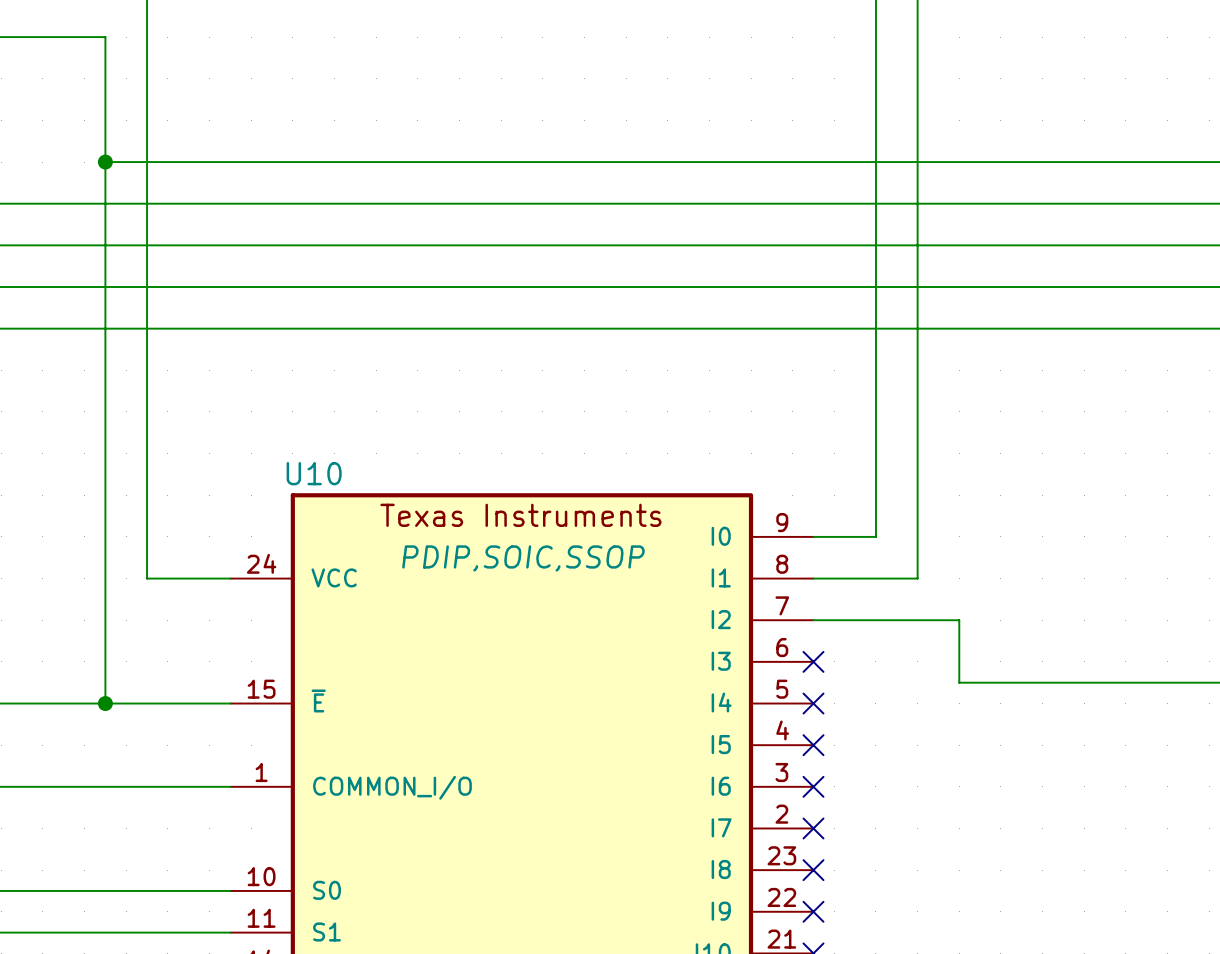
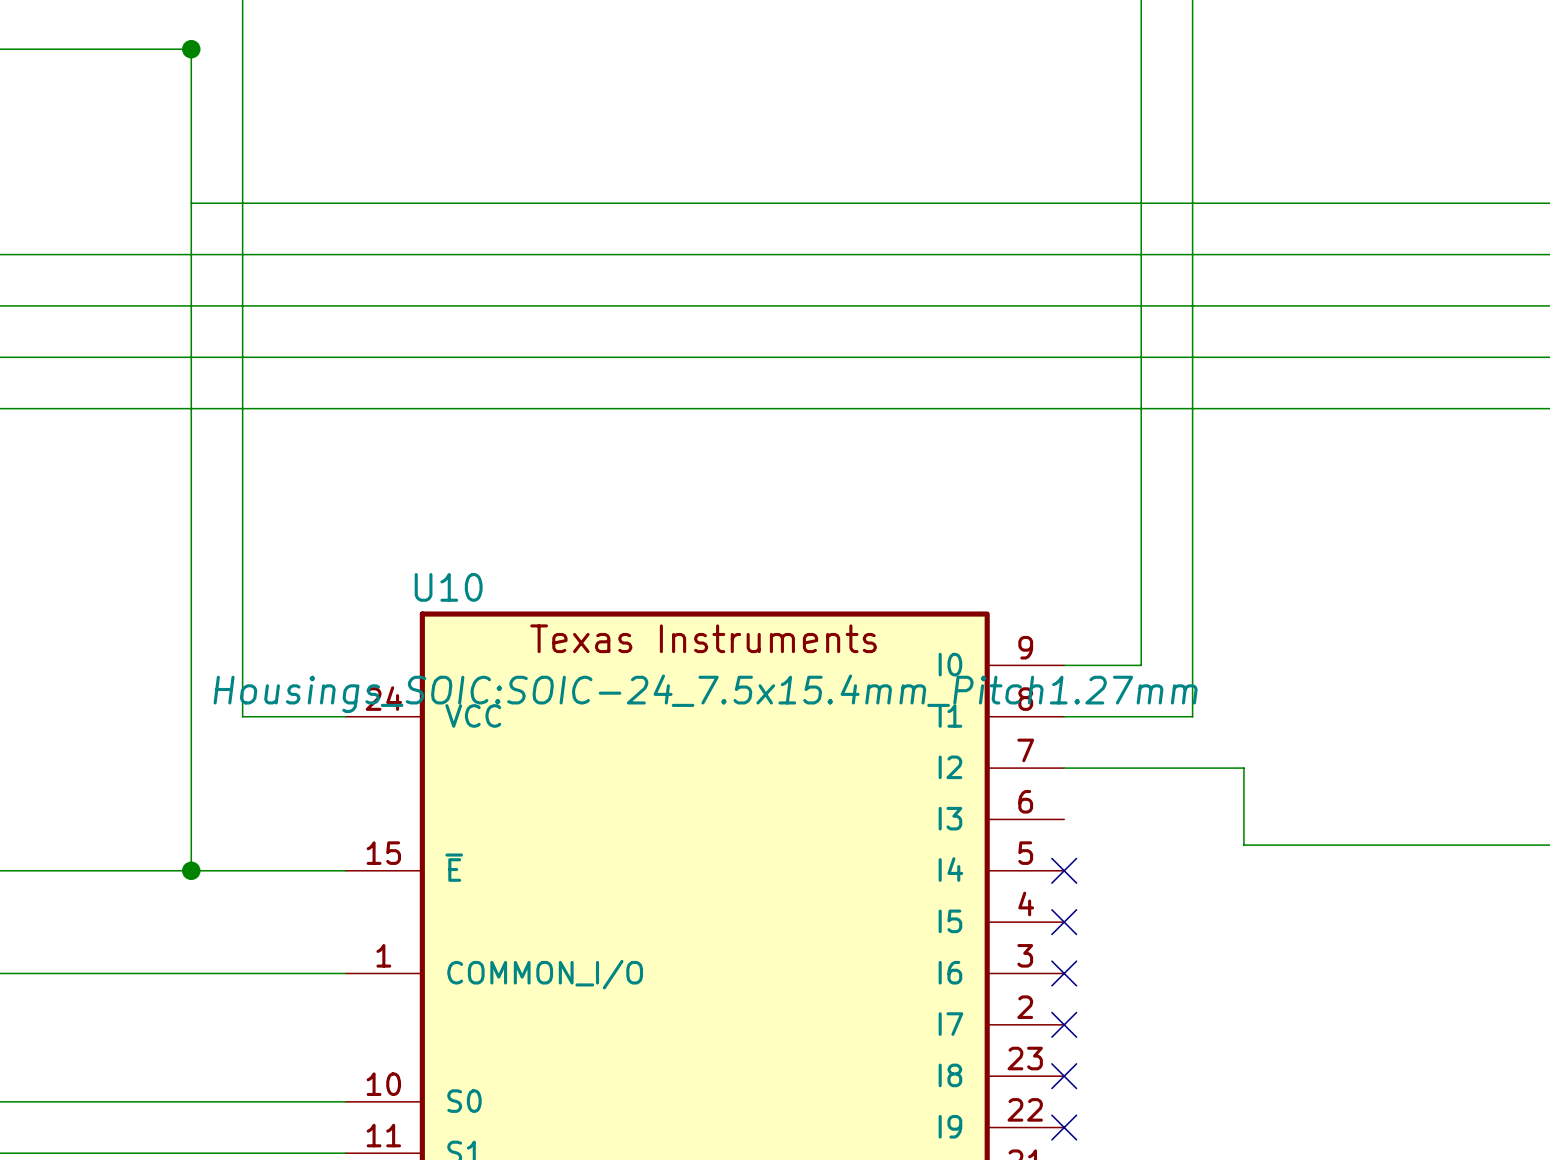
junction: none -> (191, 49)
junction: (105, 162) -> none
U10 text: PDIP,SOIC,SSOP (523, 558) -> Housings_SOIC:SOIC-24_7.5x15.4mm_Pitch1.27mm (705, 693)
no-connect mark: (813, 661) -> none

